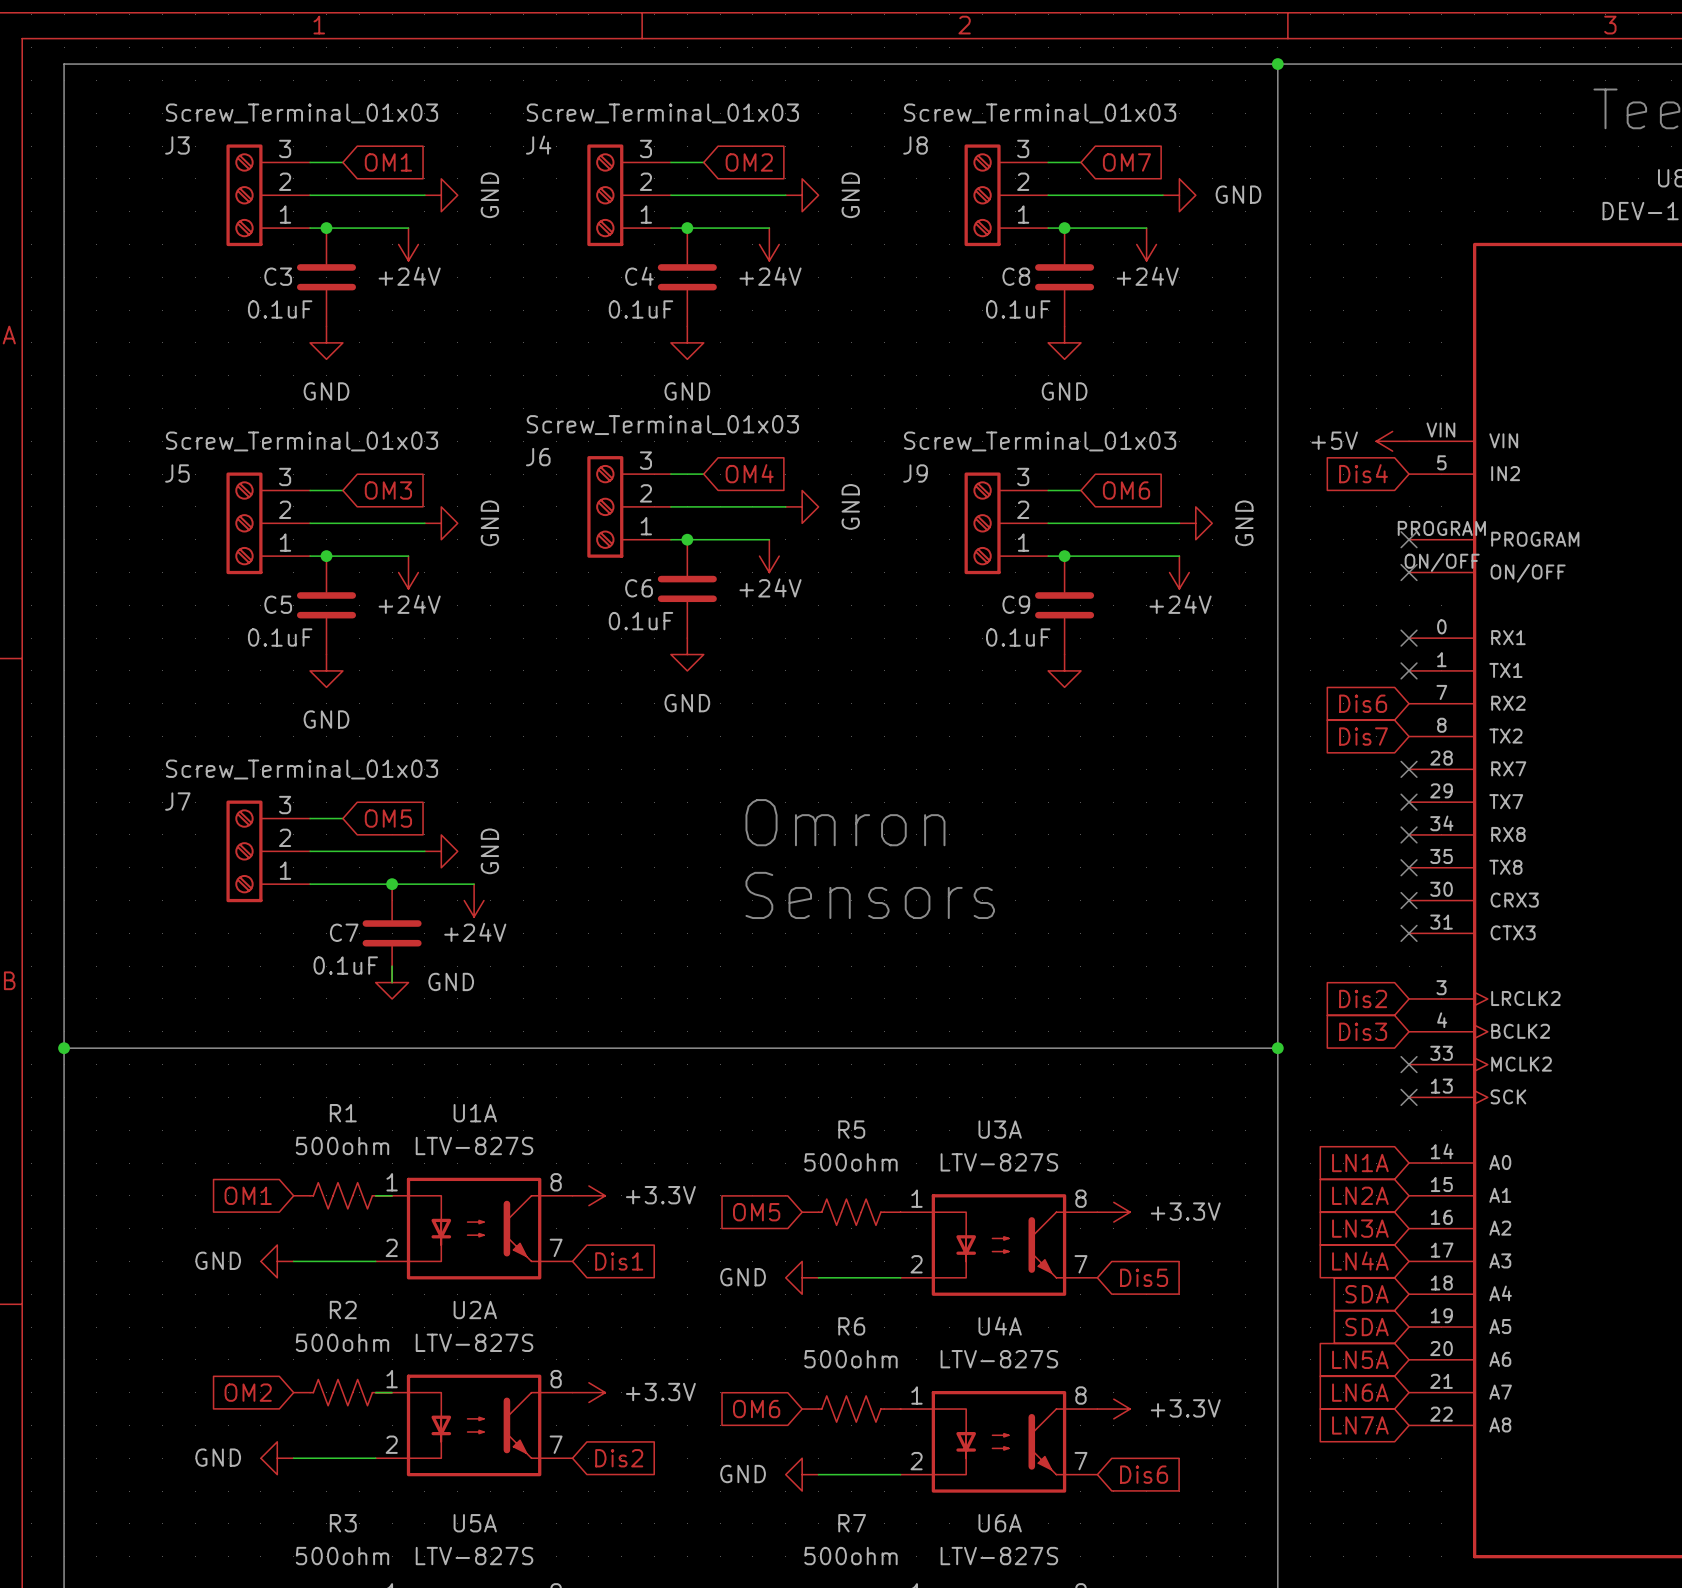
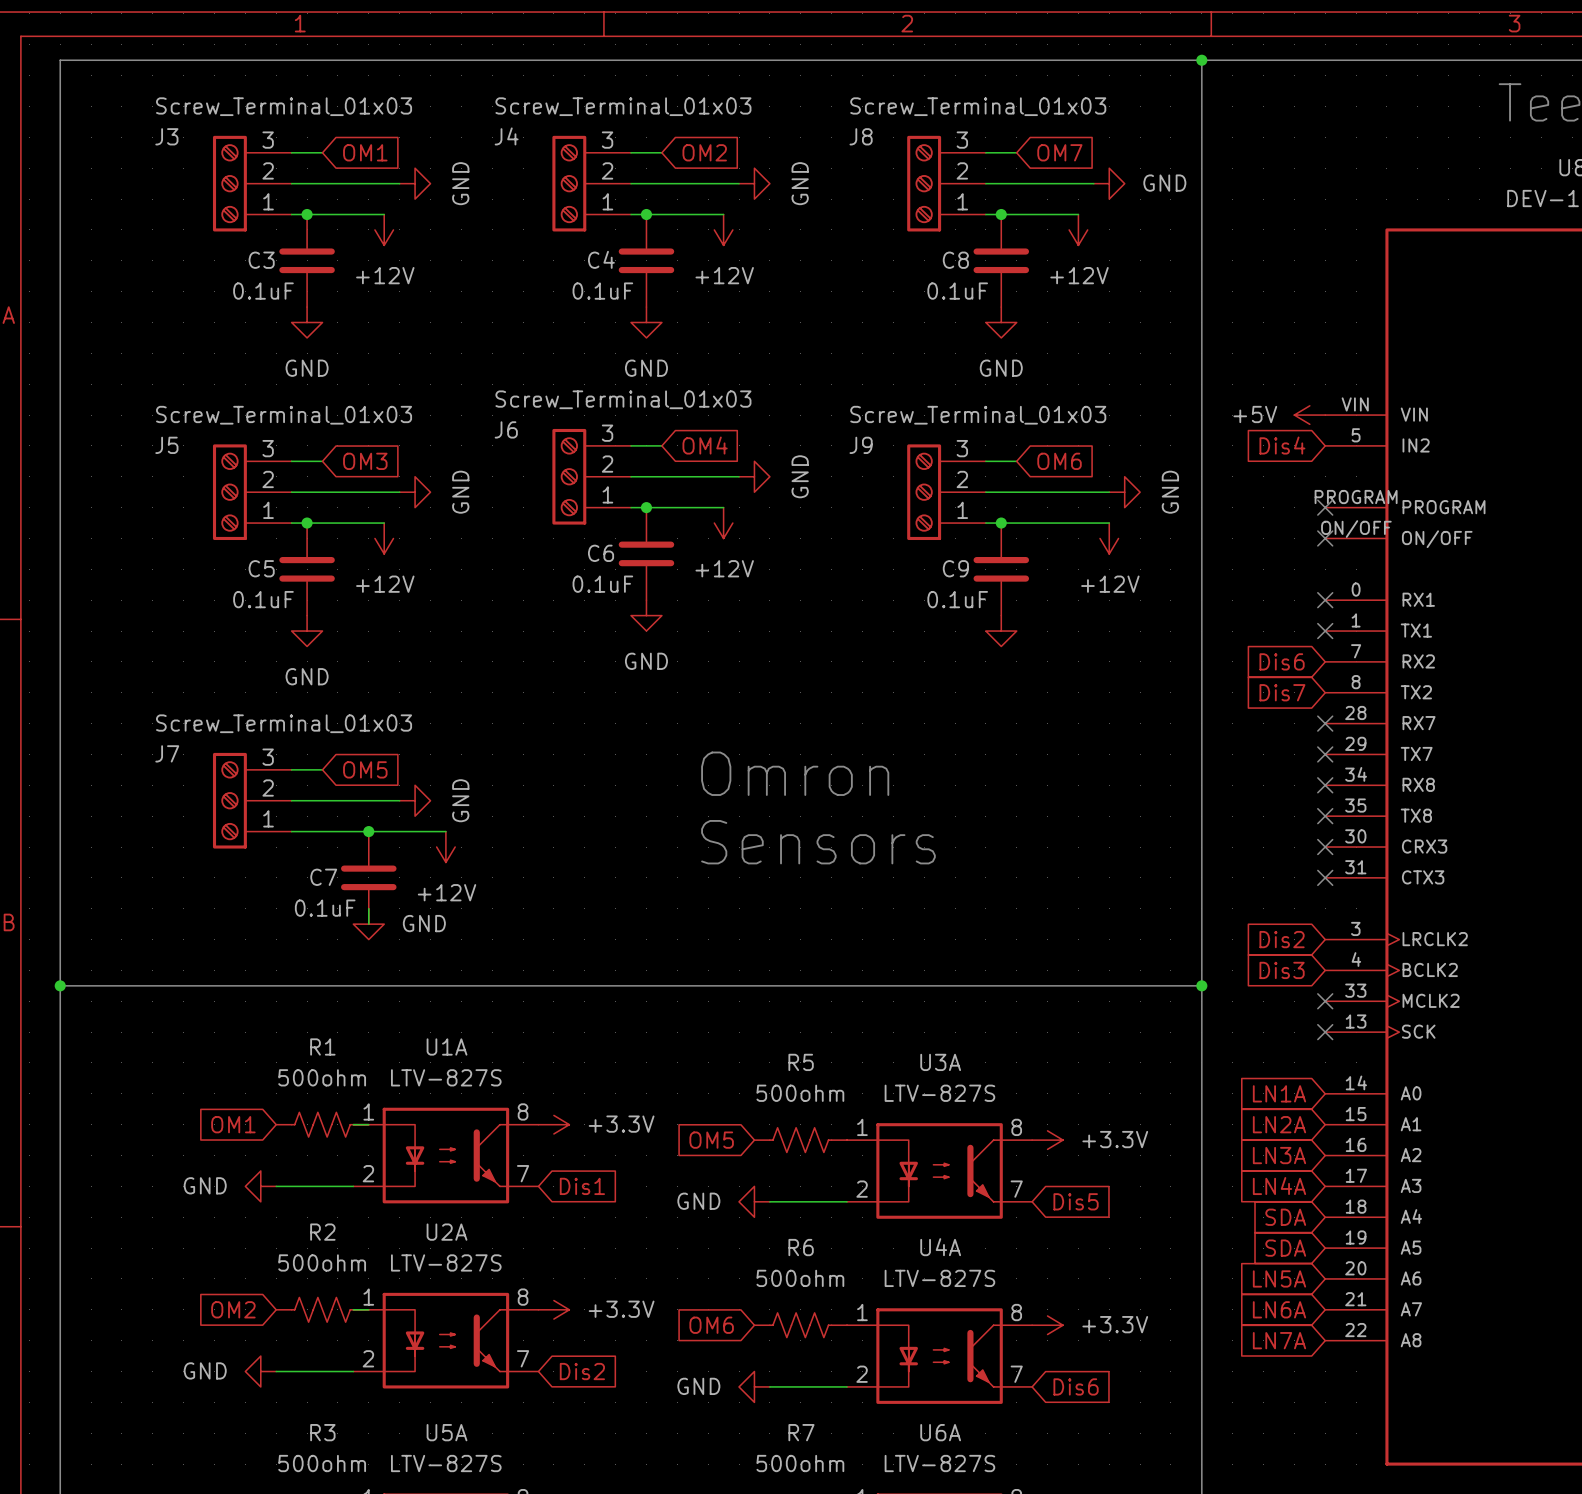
power symbol: +24V (408, 244) -> +12V (384, 229)
power symbol: +24V (769, 244) -> +12V (723, 229)
power symbol: +24V (1146, 244) -> +12V (1078, 229)
power symbol: +24V (769, 556) -> +12V (723, 523)
power symbol: +24V (408, 572) -> +12V (384, 538)
power symbol: +24V (1179, 572) -> +12V (1109, 538)
power symbol: +24V (474, 900) -> +12V (445, 847)

